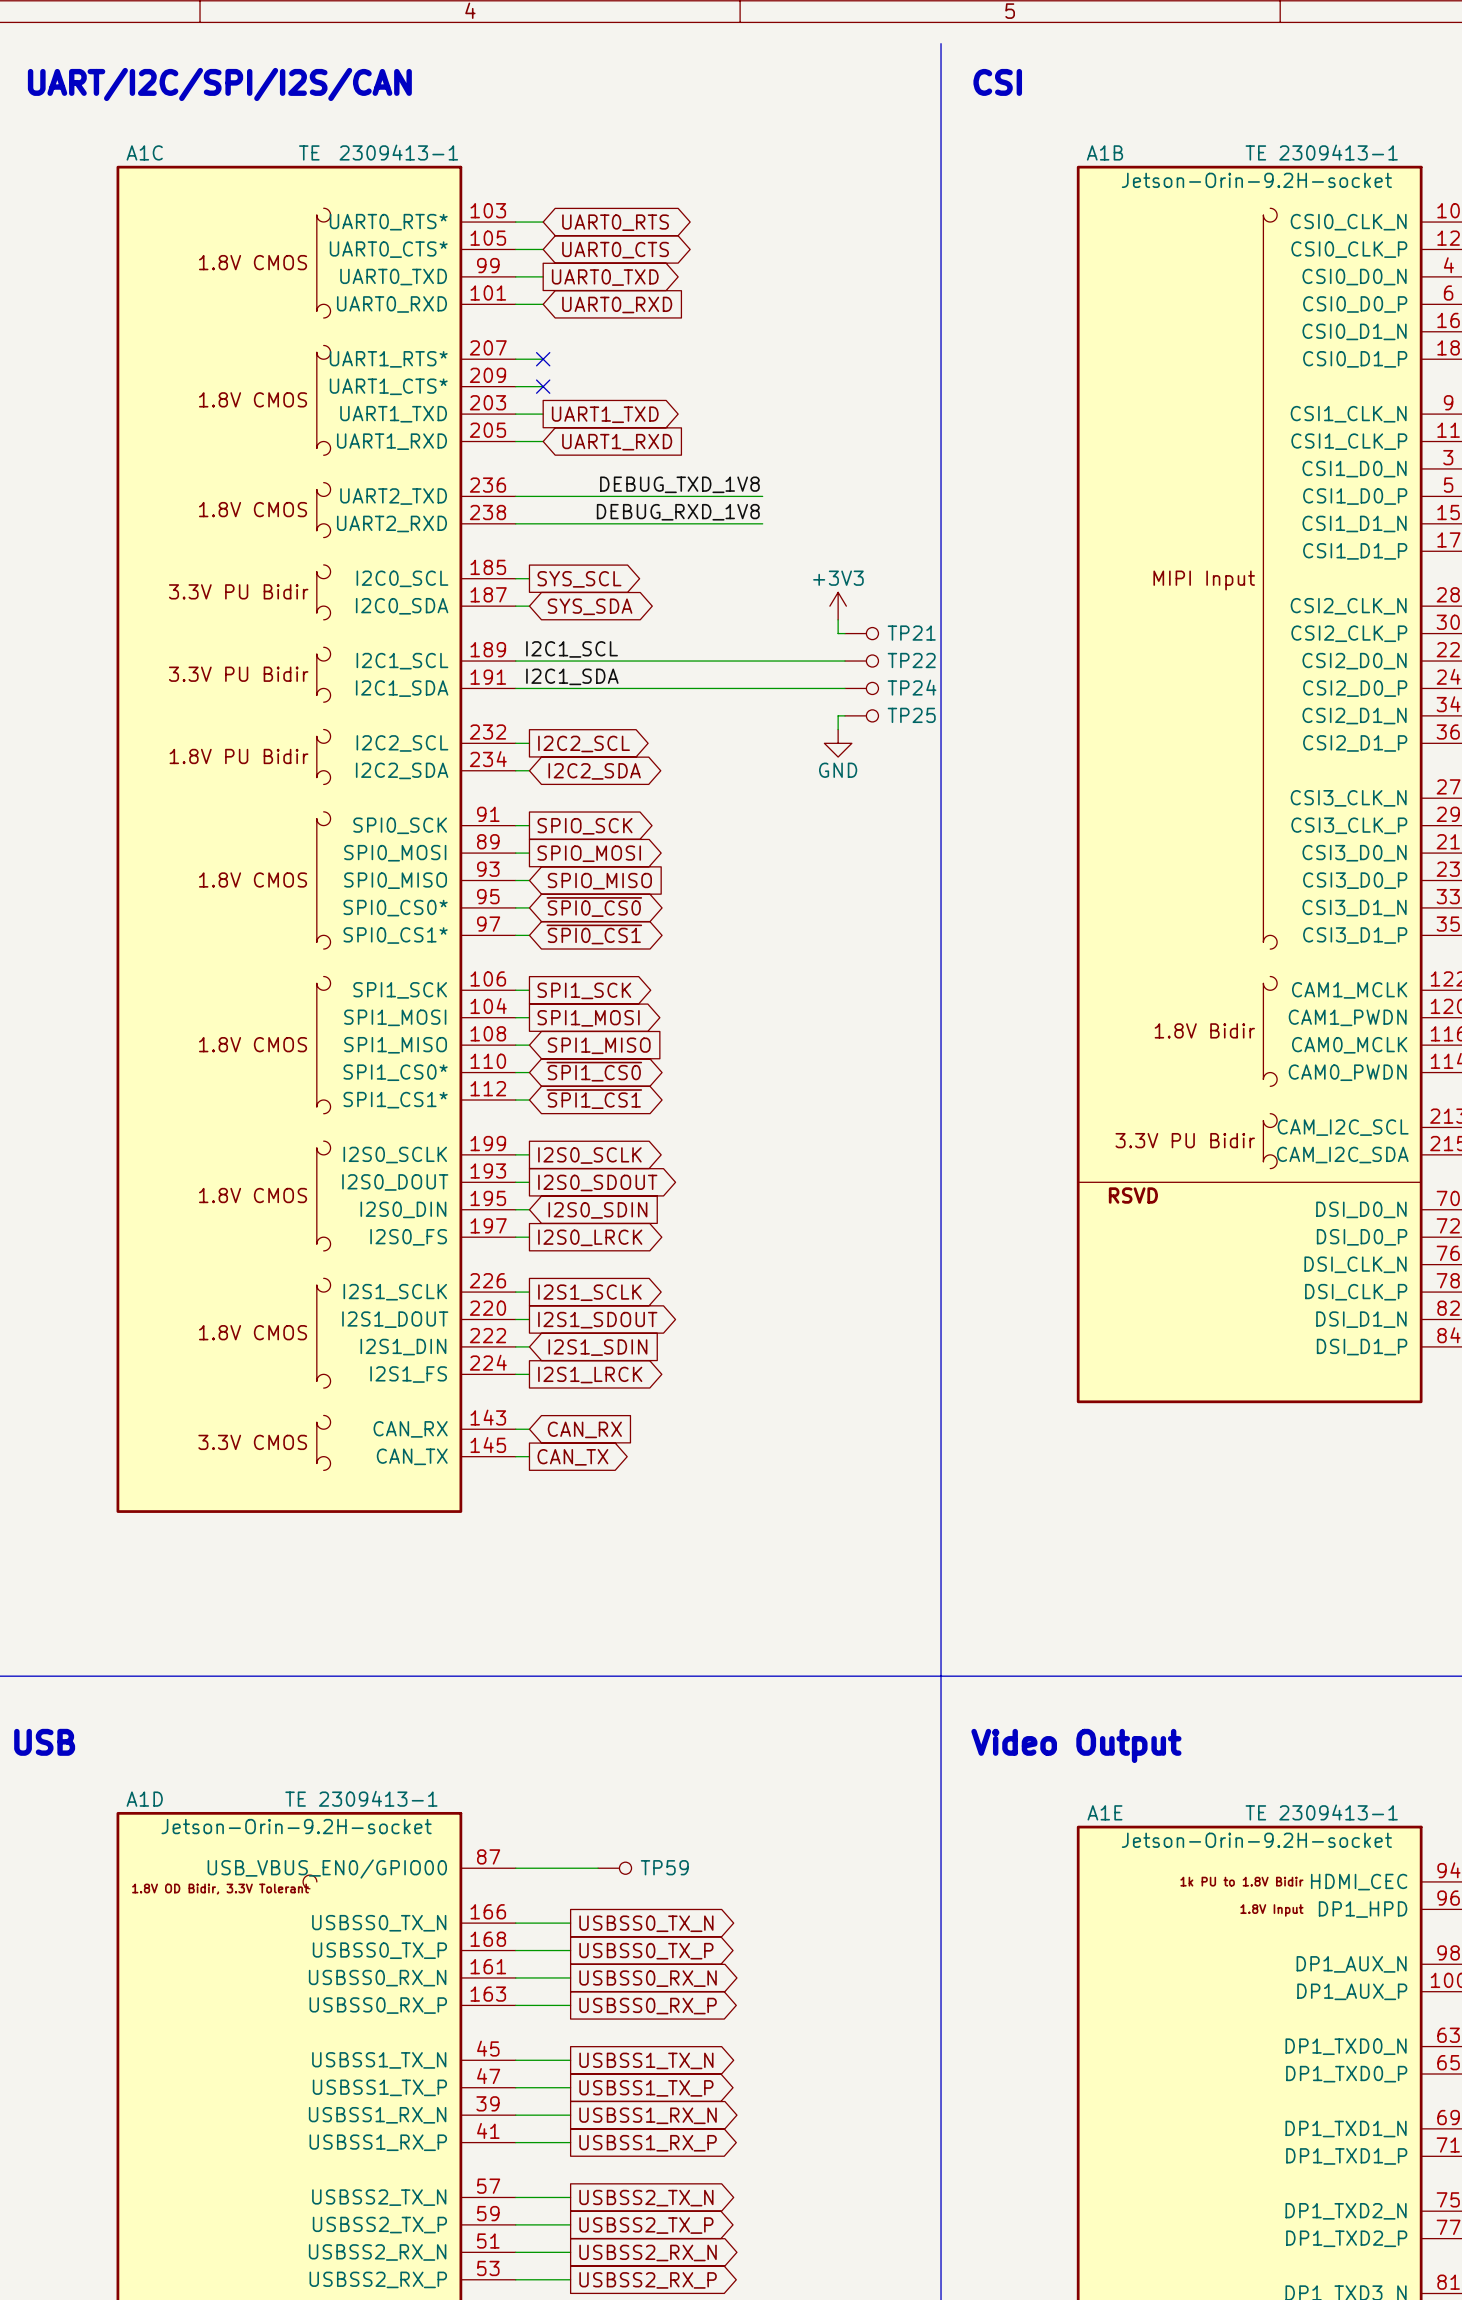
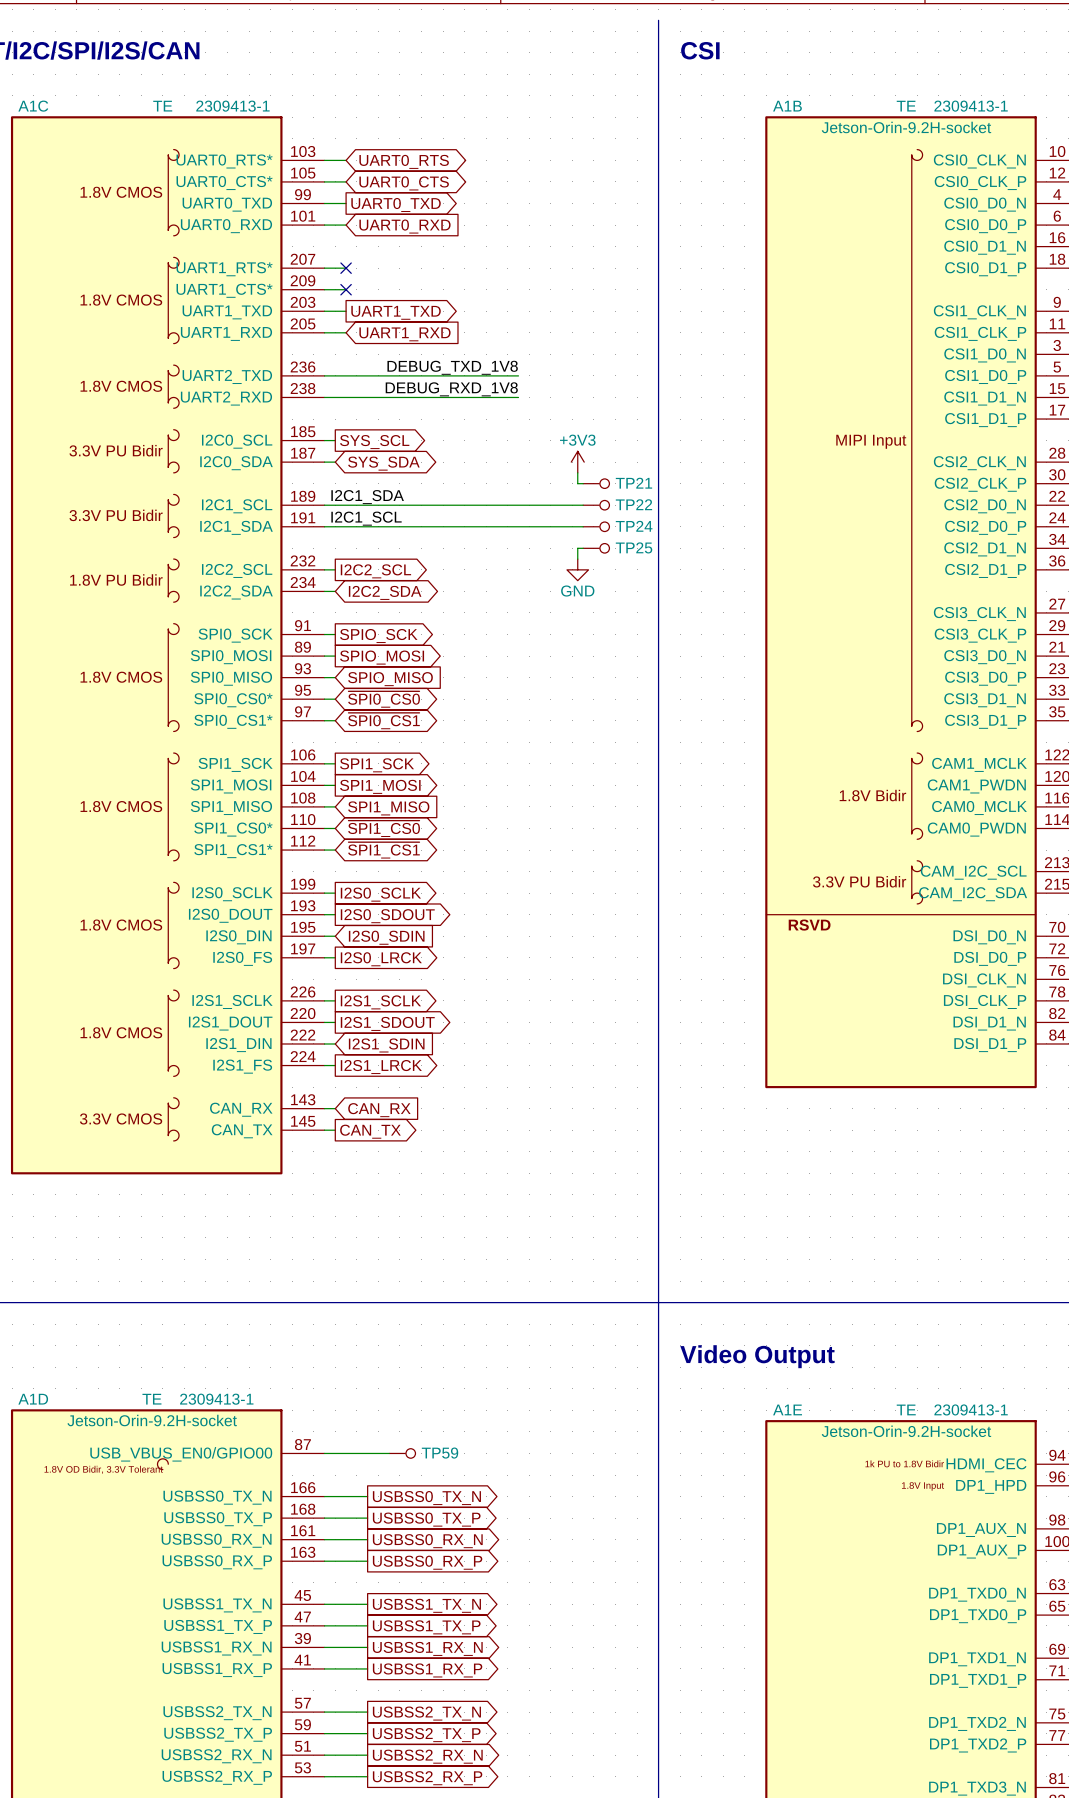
label: I2C1_SCL (572, 649) -> I2C1_SDA (367, 497)
label: I2C1_SDA (572, 676) -> I2C1_SCL (366, 518)

